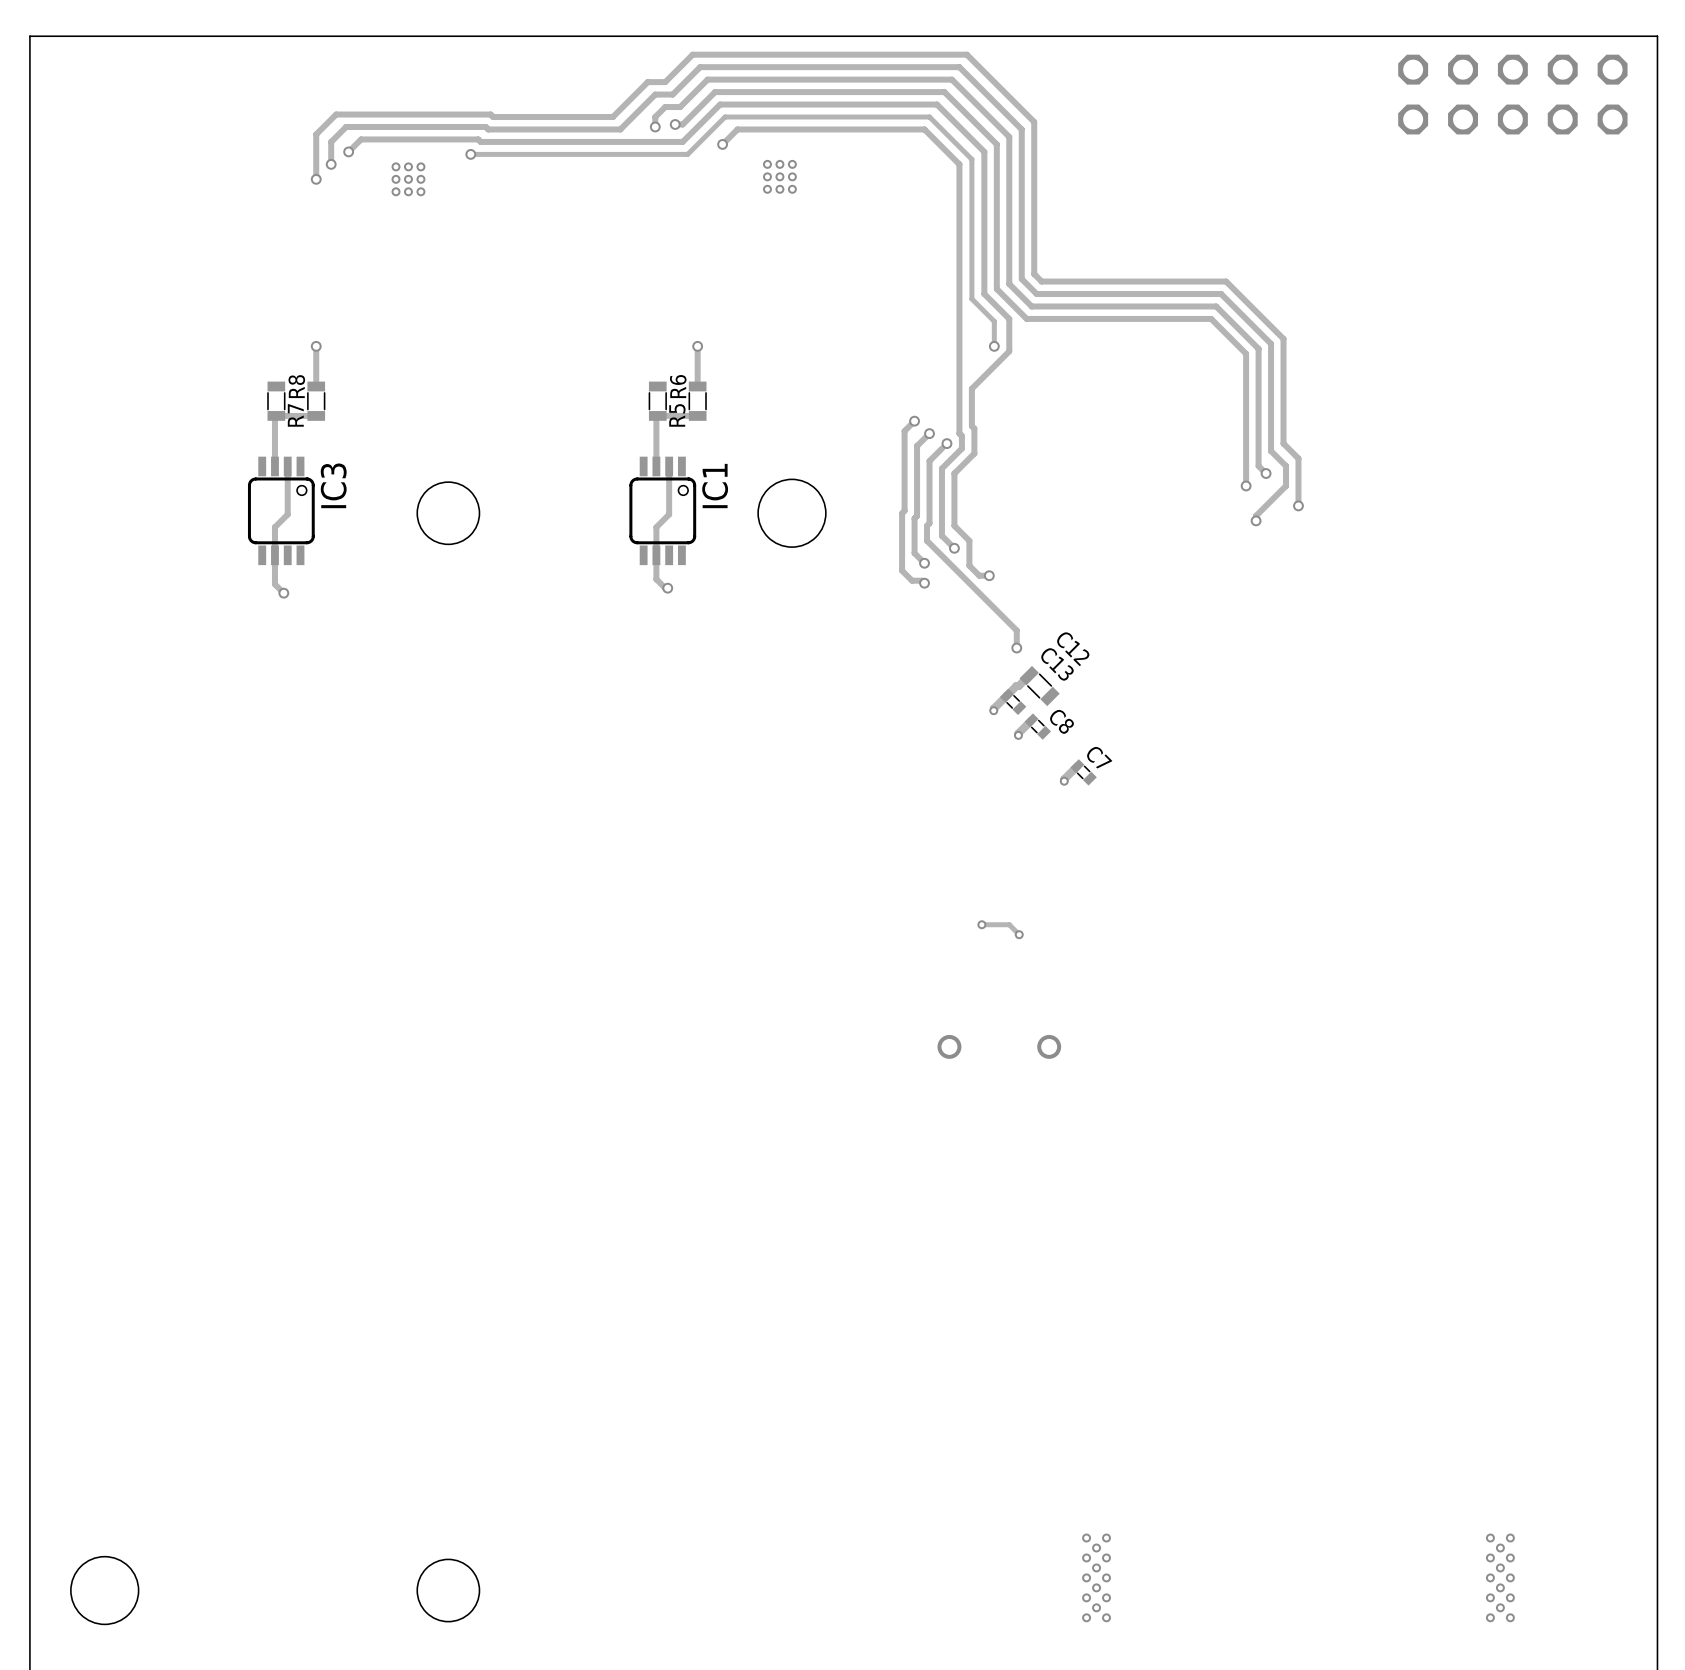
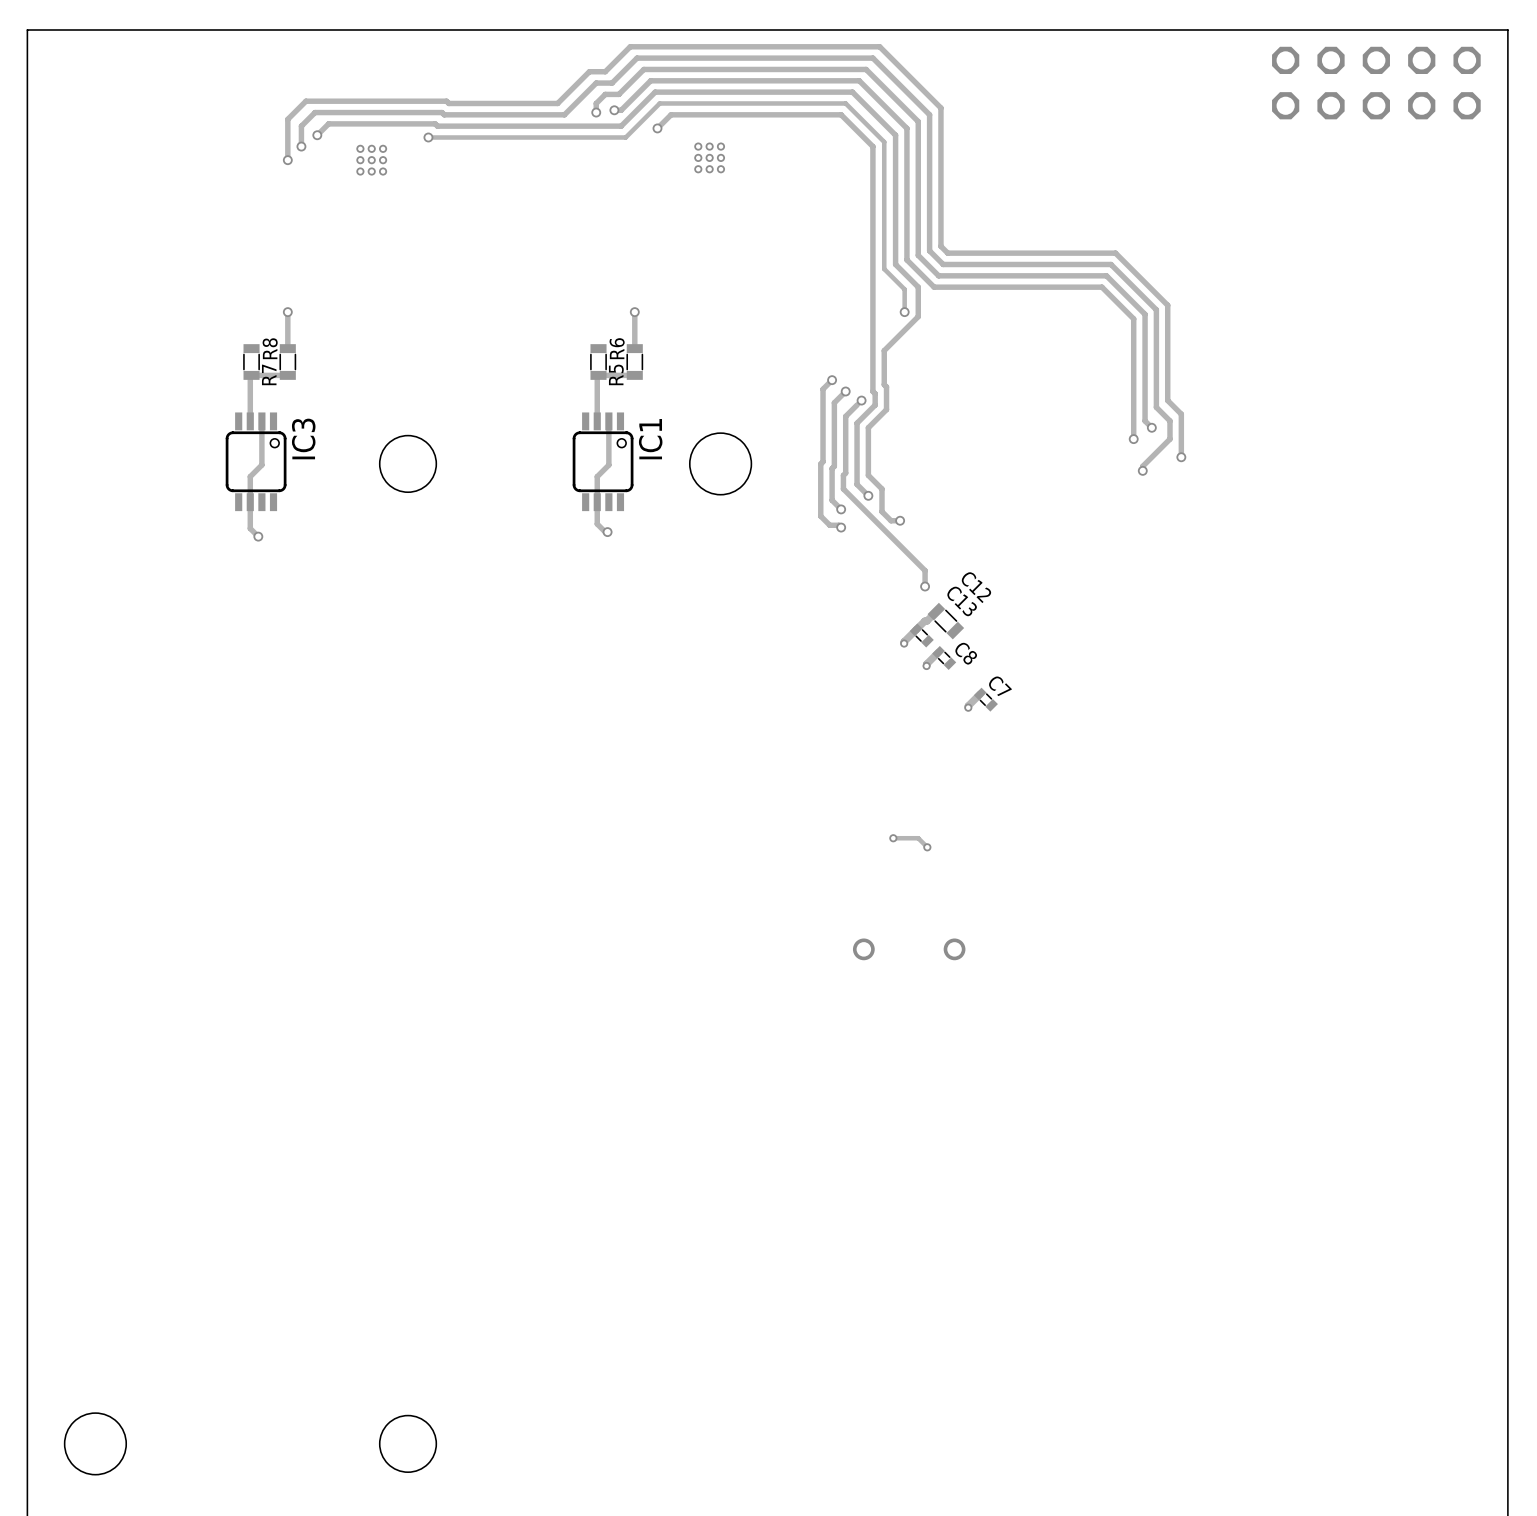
via: (1086, 1538) -> none
via: (1106, 1538) -> none
via: (1490, 1538) -> none
via: (1510, 1538) -> none
via: (1096, 1547) -> none
via: (1500, 1547) -> none
via: (1086, 1557) -> none
via: (1106, 1557) -> none
via: (1490, 1557) -> none
via: (1510, 1557) -> none
via: (1096, 1567) -> none
via: (1500, 1567) -> none
via: (1086, 1577) -> none
via: (1106, 1577) -> none
via: (1490, 1577) -> none
via: (1510, 1577) -> none
via: (1096, 1587) -> none
via: (1500, 1587) -> none
via: (1086, 1597) -> none
via: (1106, 1597) -> none
via: (1490, 1597) -> none
via: (1510, 1597) -> none
via: (1096, 1607) -> none
via: (1500, 1607) -> none
via: (1086, 1617) -> none
via: (1106, 1617) -> none
via: (1490, 1617) -> none
via: (1510, 1617) -> none

